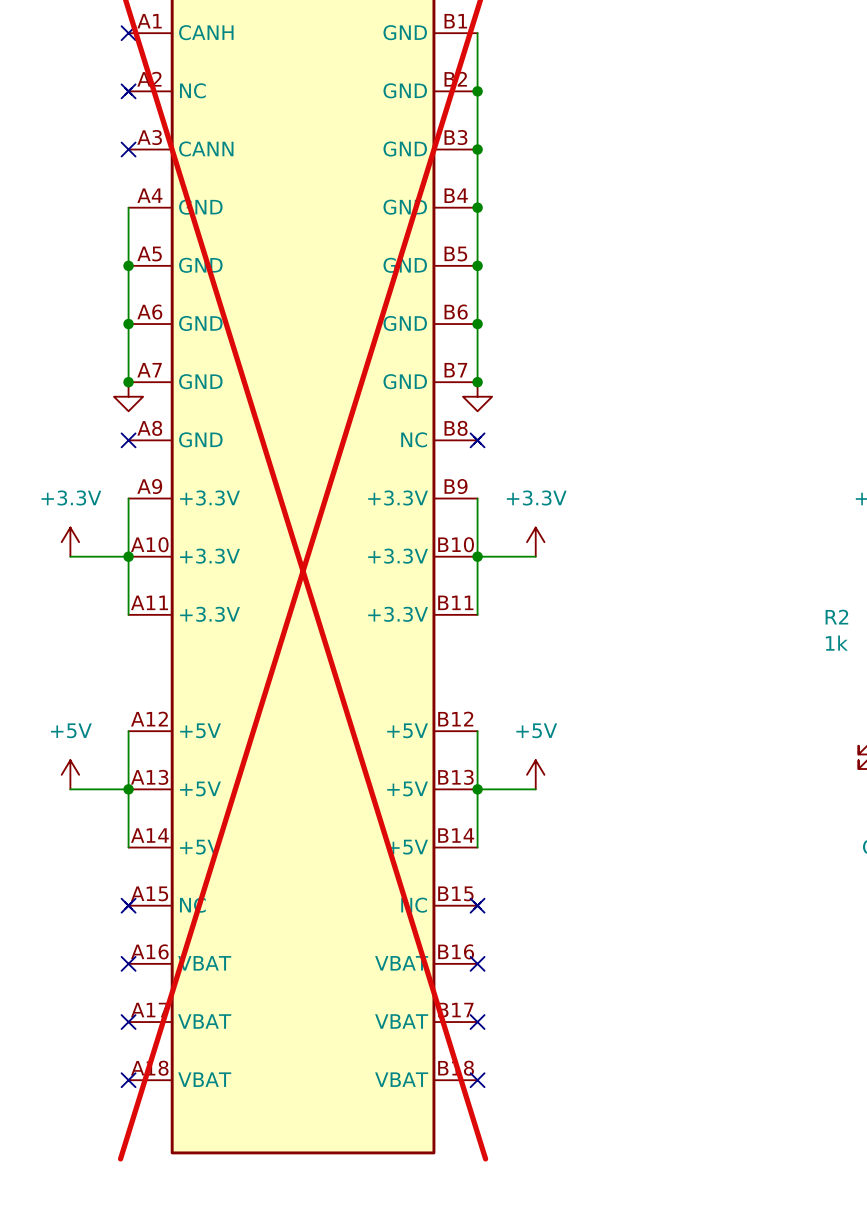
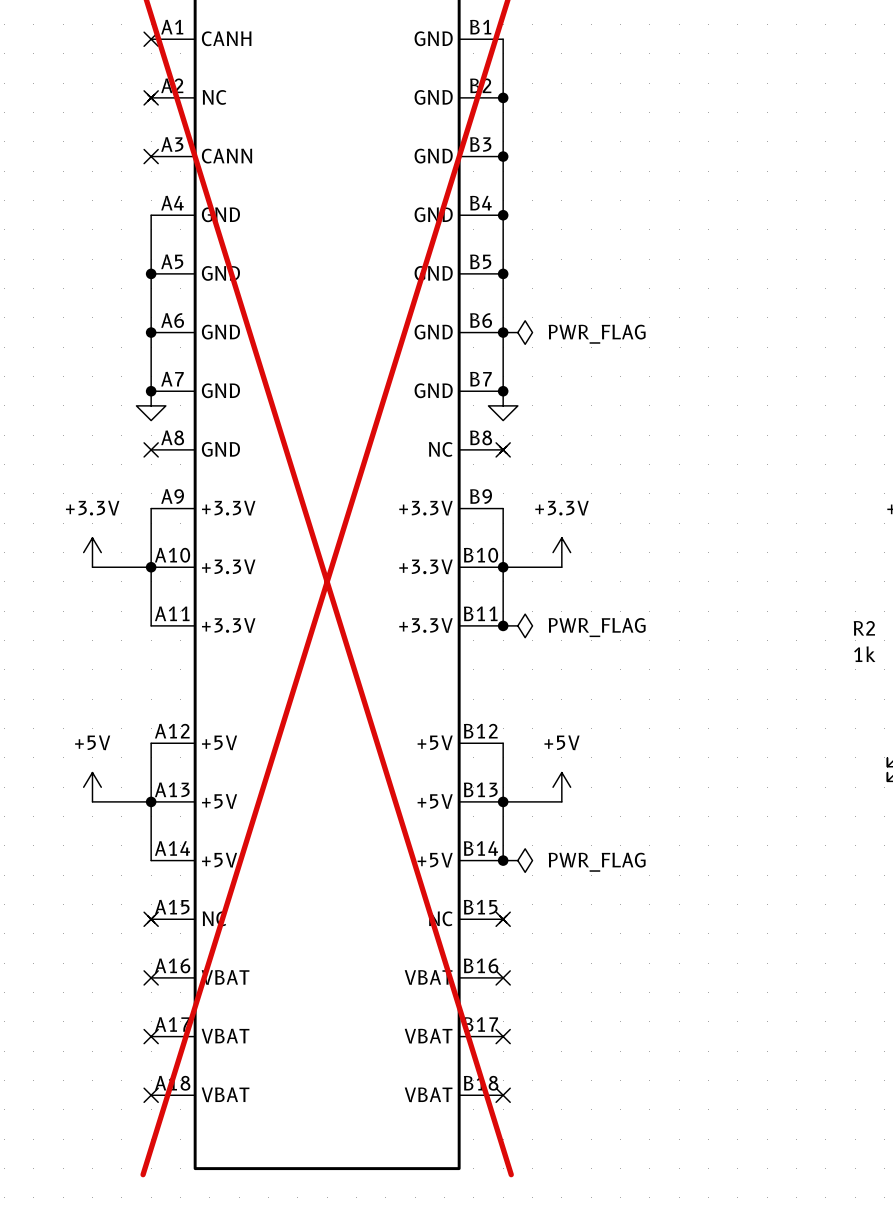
power symbol: none -> PWR_FLAG (517, 332)
junction: none -> (503, 625)
power symbol: none -> PWR_FLAG (517, 625)
junction: none -> (503, 860)
power symbol: none -> PWR_FLAG (517, 860)

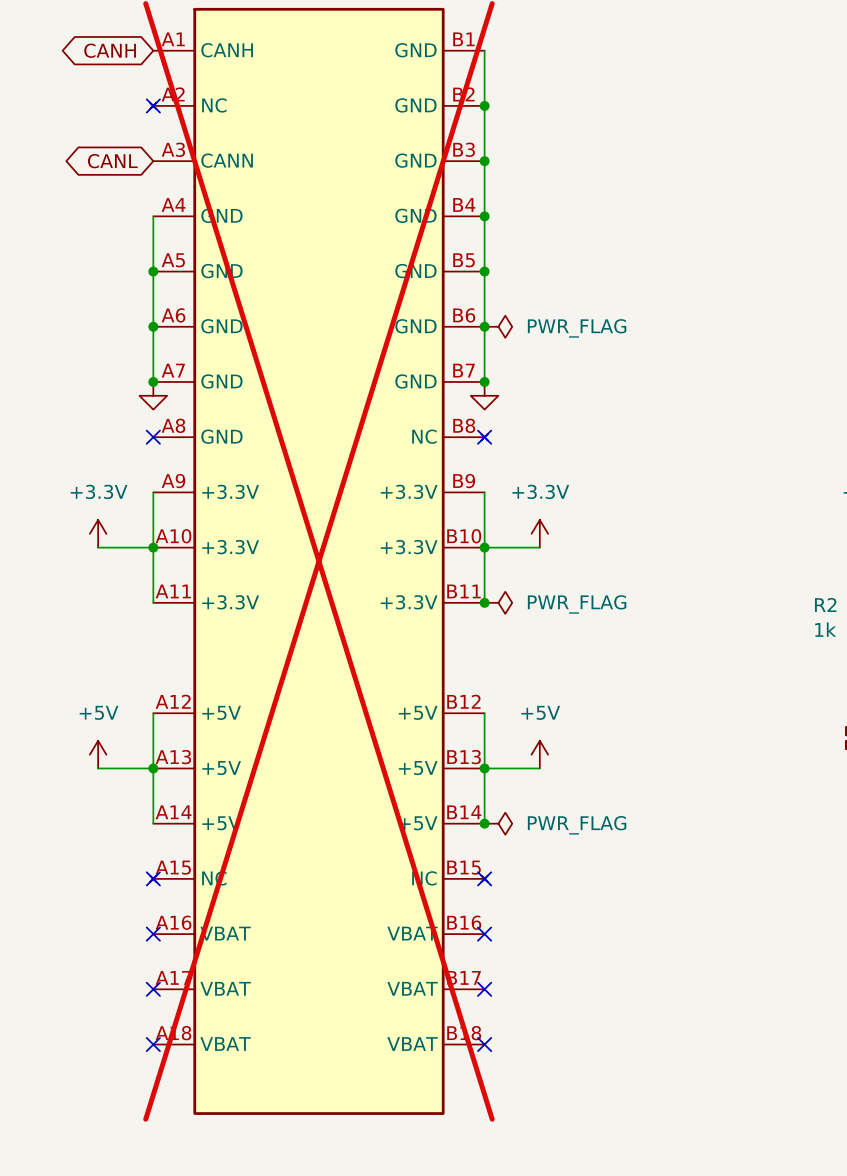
global label: none -> CANH (110, 50)
no-connect mark: (151, 39) -> none
global label: none -> CANL (112, 161)
no-connect mark: (151, 156) -> none

